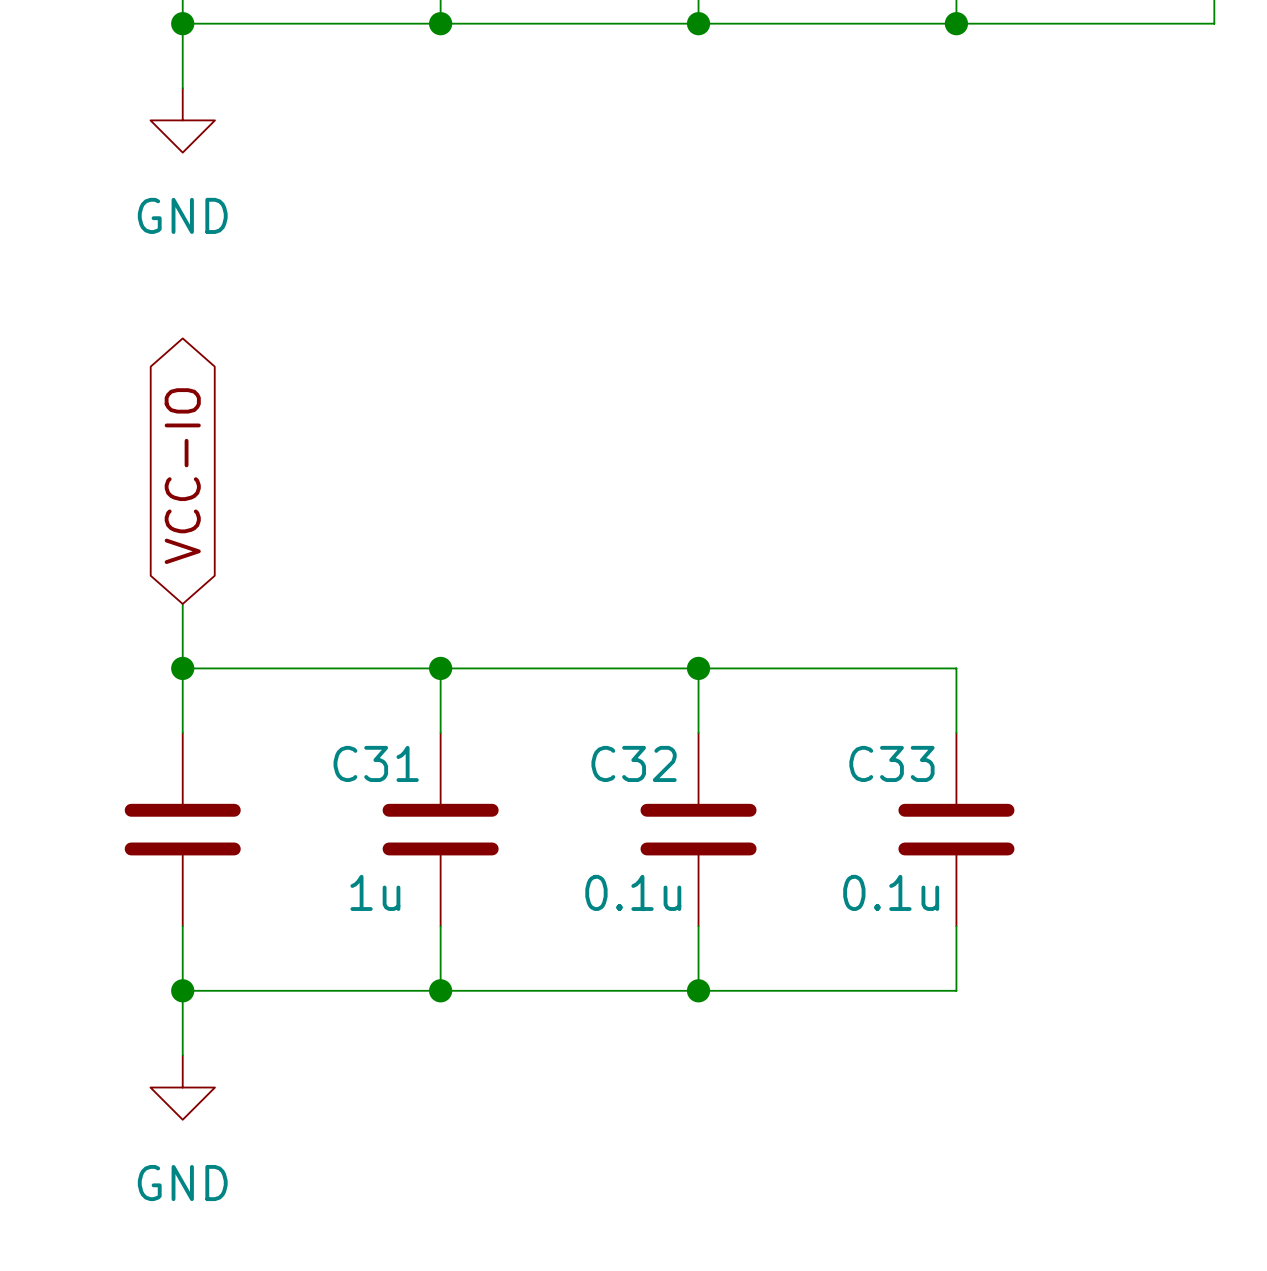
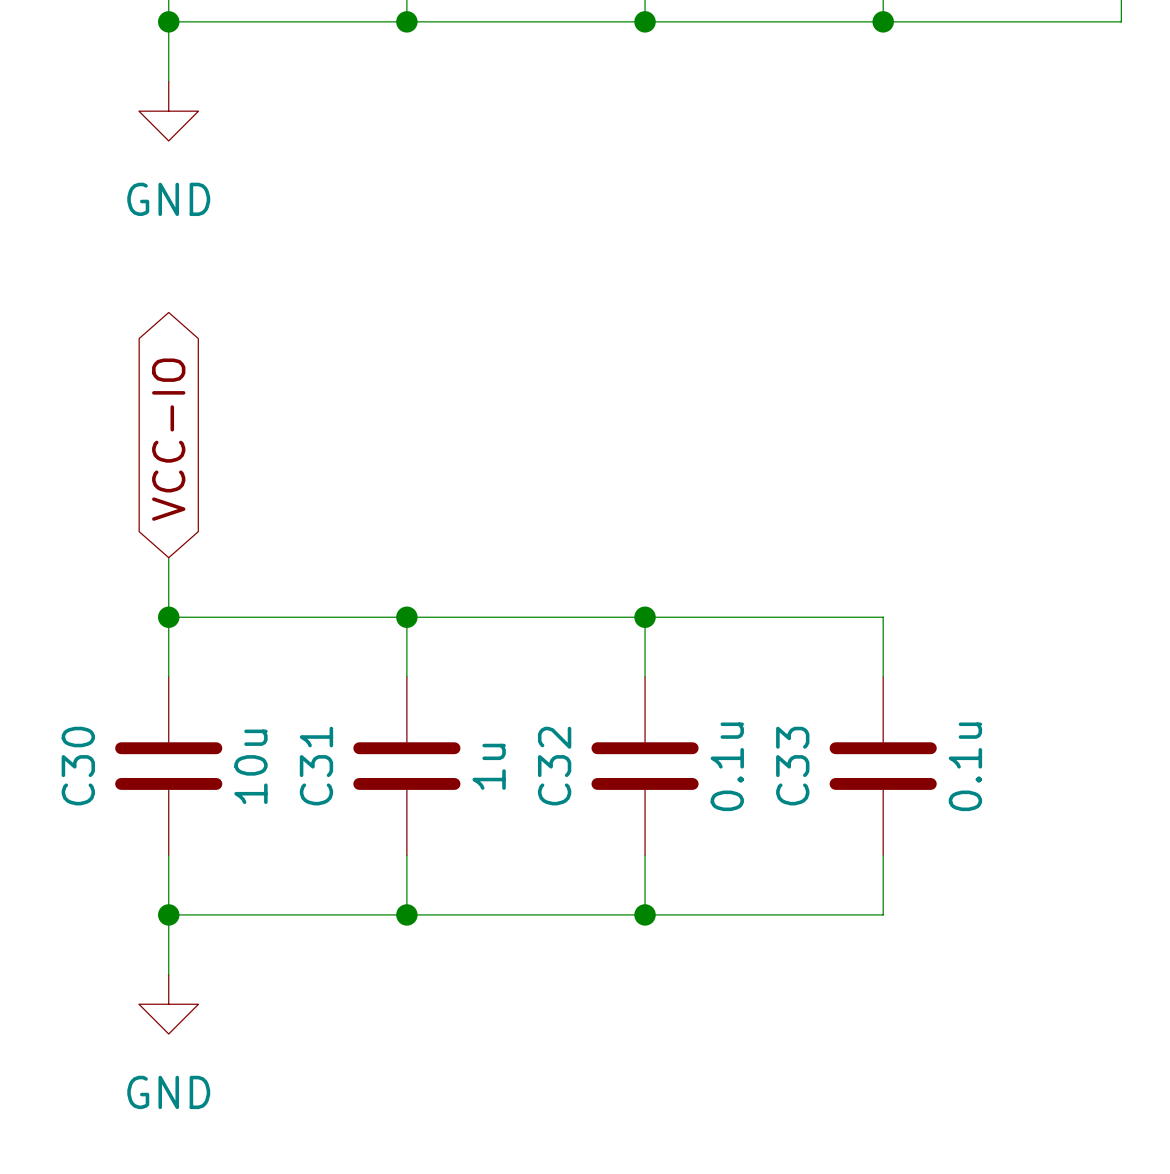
C31 name rotation: 0° (376, 763) -> 90° counterclockwise (316, 766)
C32 name rotation: 0° (634, 763) -> 90° counterclockwise (554, 766)
C33 name rotation: 0° (891, 763) -> 90° counterclockwise (792, 766)
C30 name: none -> C30 (78, 766)
C30 value: none -> 10u (250, 766)
C31 value rotation: 0° (375, 892) -> 90° counterclockwise (489, 766)
C31 value position: 1u (375, 892) -> 1u (489, 766)
C32 value rotation: 0° (633, 892) -> 90° counterclockwise (727, 766)
C32 value position: 0.1u (633, 892) -> 0.1u (727, 766)
C33 value rotation: 0° (891, 892) -> 90° counterclockwise (965, 766)
C33 value position: 0.1u (891, 892) -> 0.1u (965, 766)

